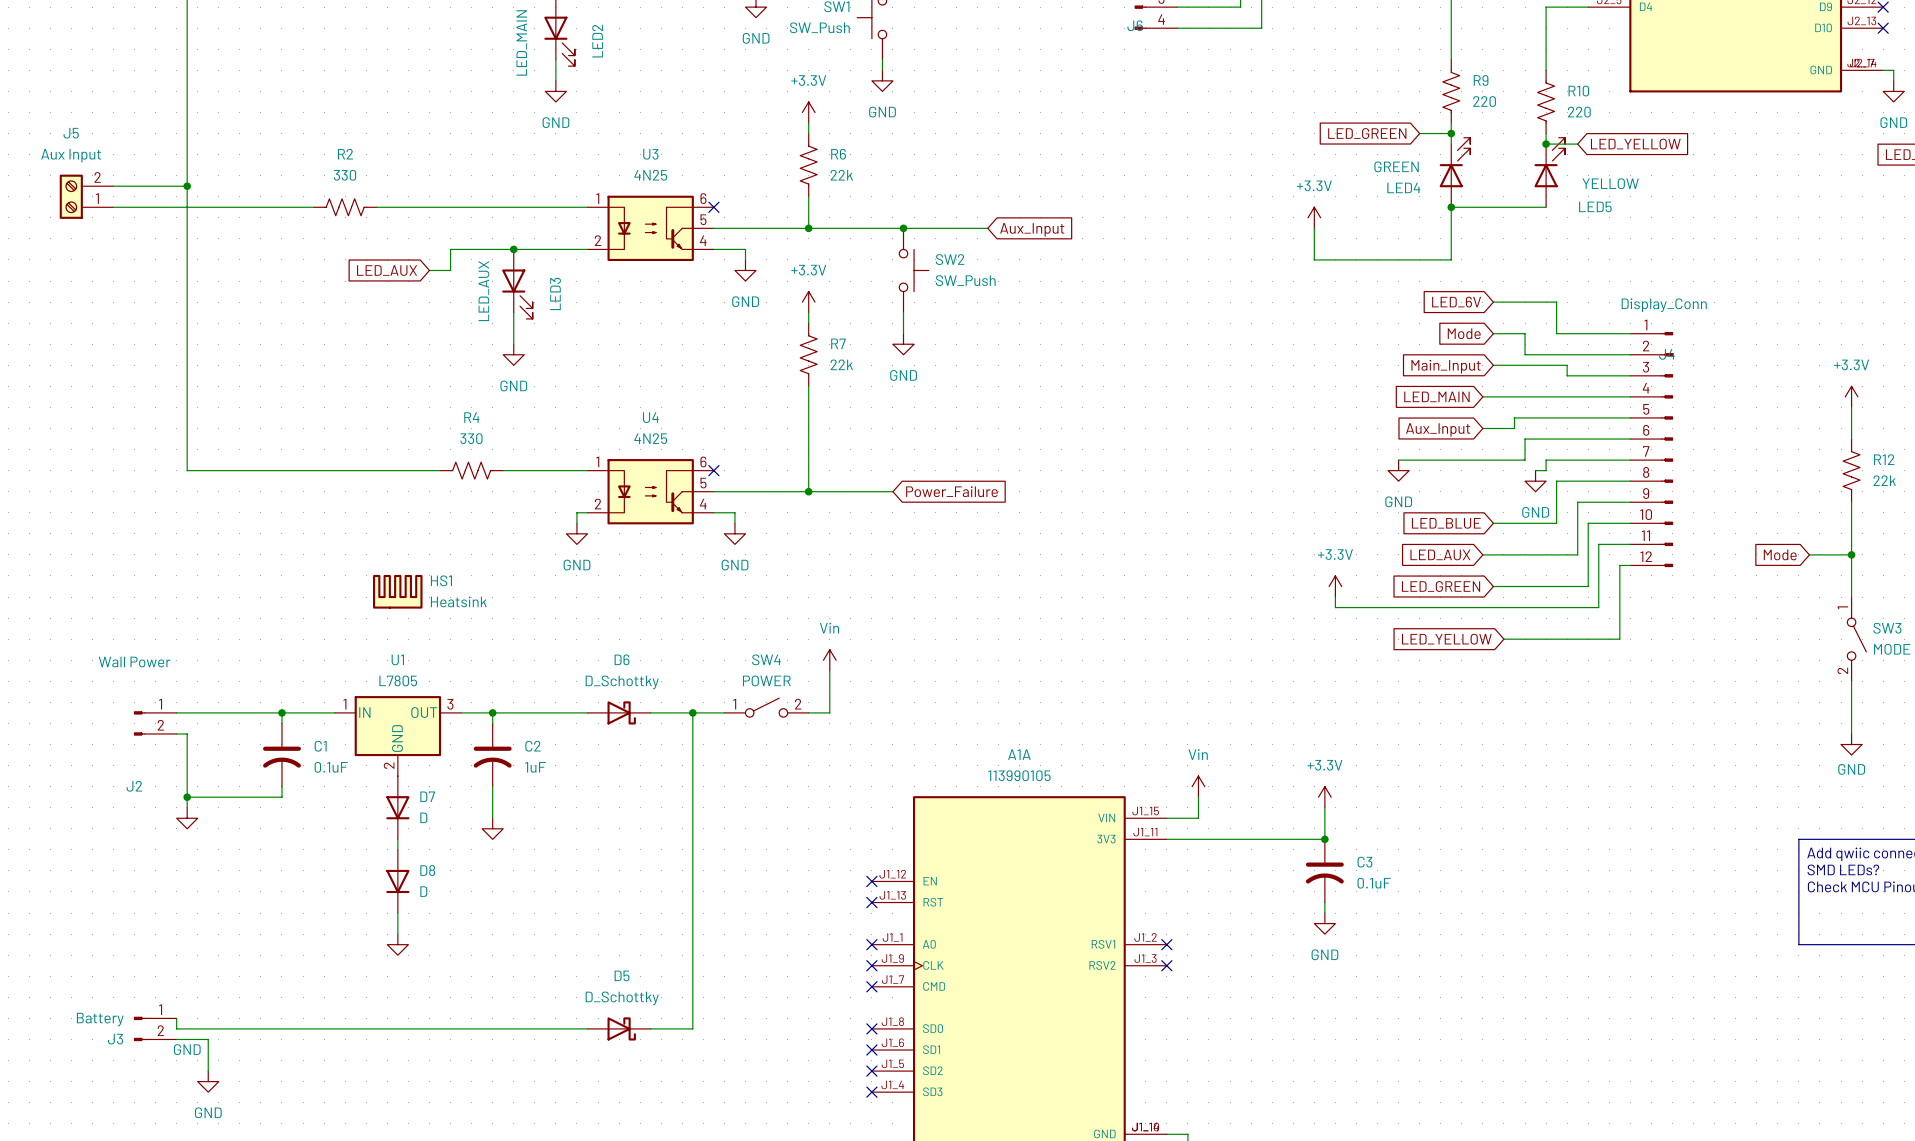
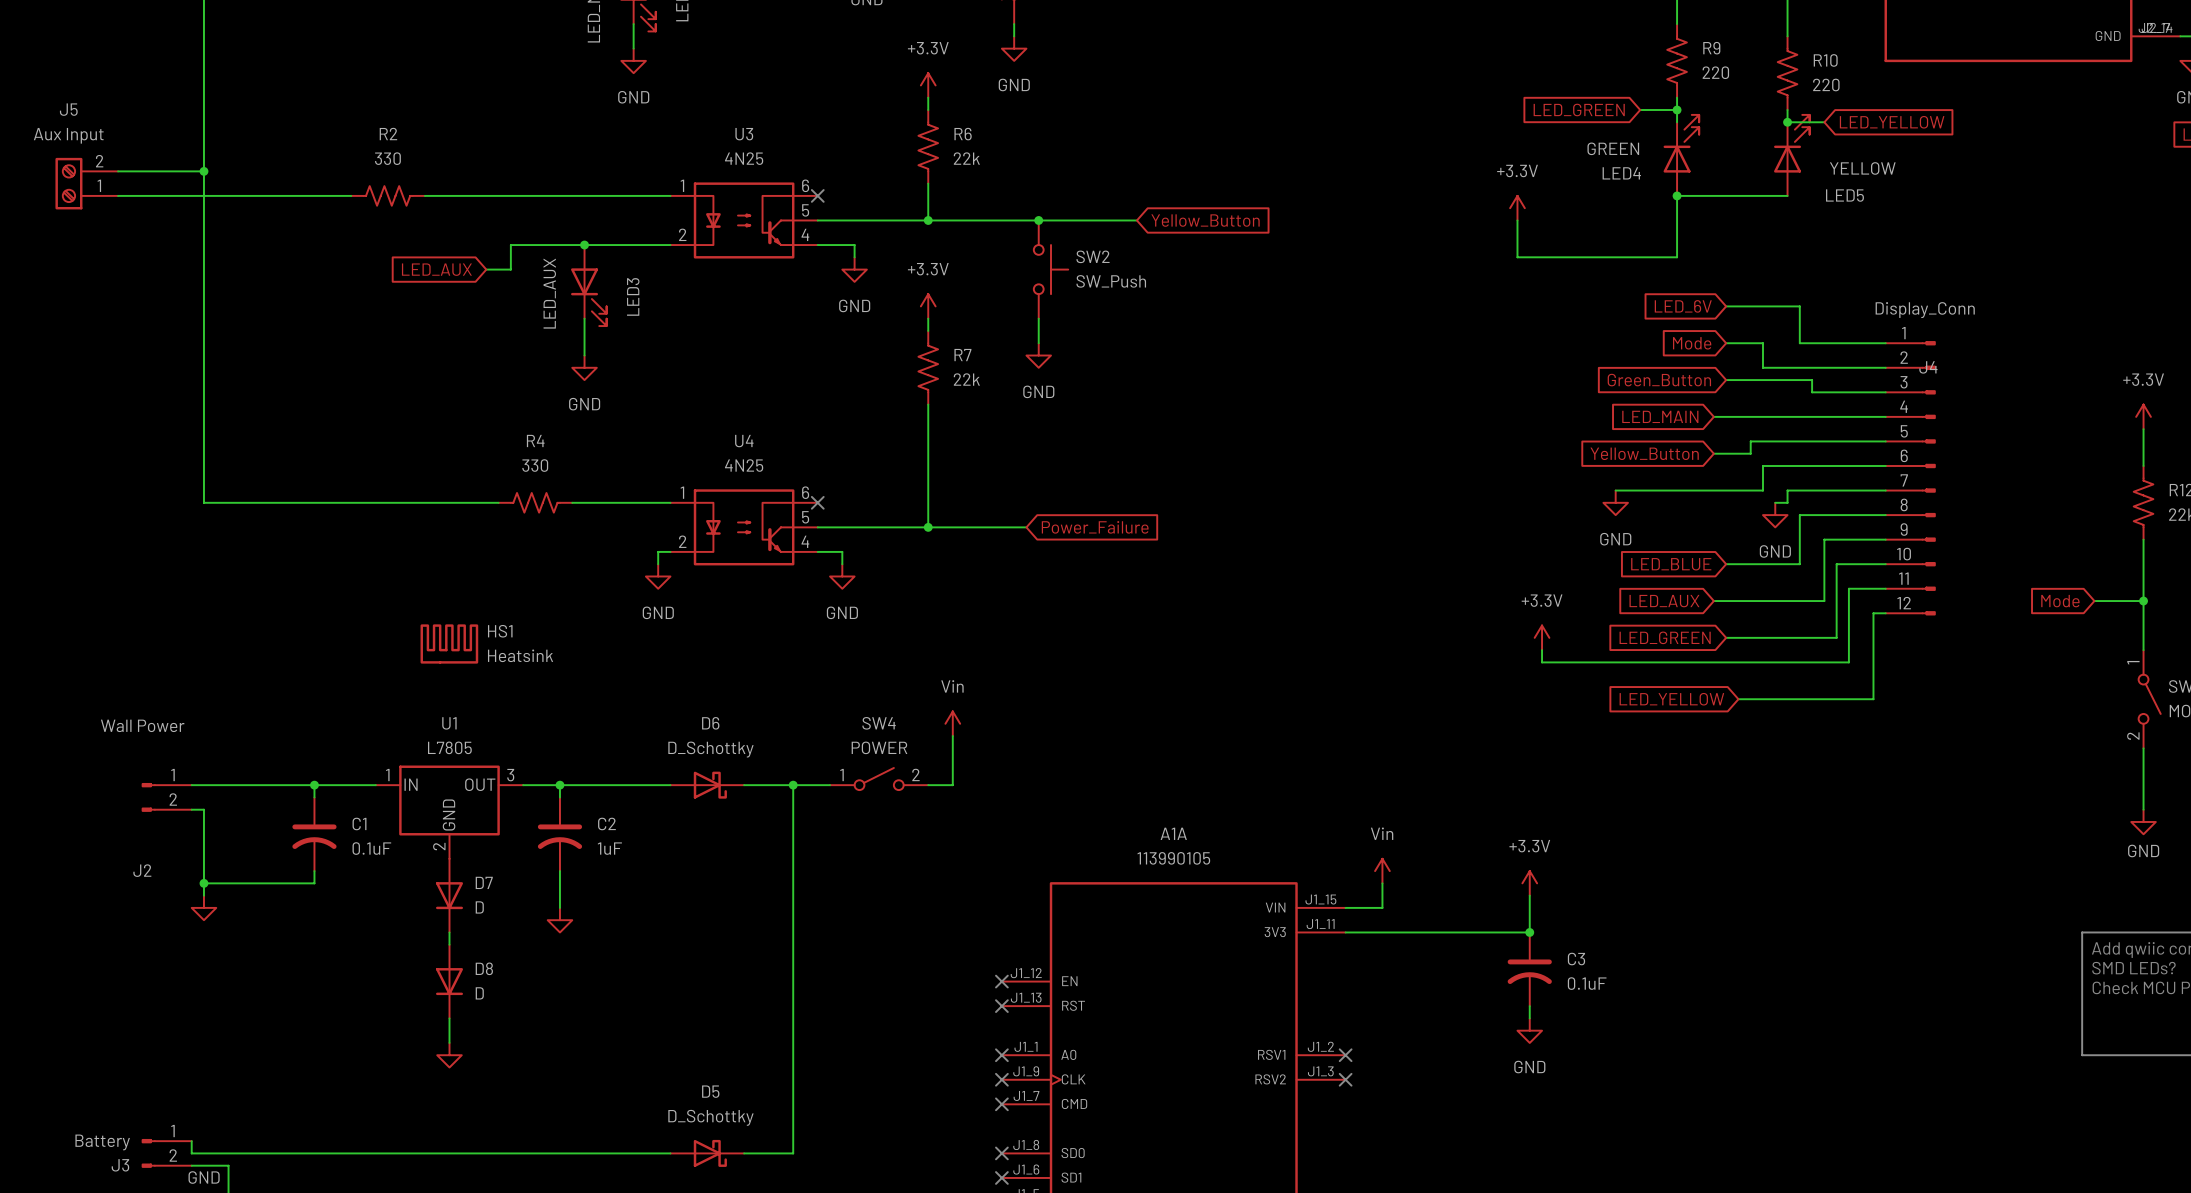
global label: Aux_Input (1032, 229) -> Yellow_Button (1205, 220)
global label: Main_Input (1446, 366) -> Green_Button (1659, 380)
global label: Aux_Input (1438, 429) -> Yellow_Button (1644, 453)

